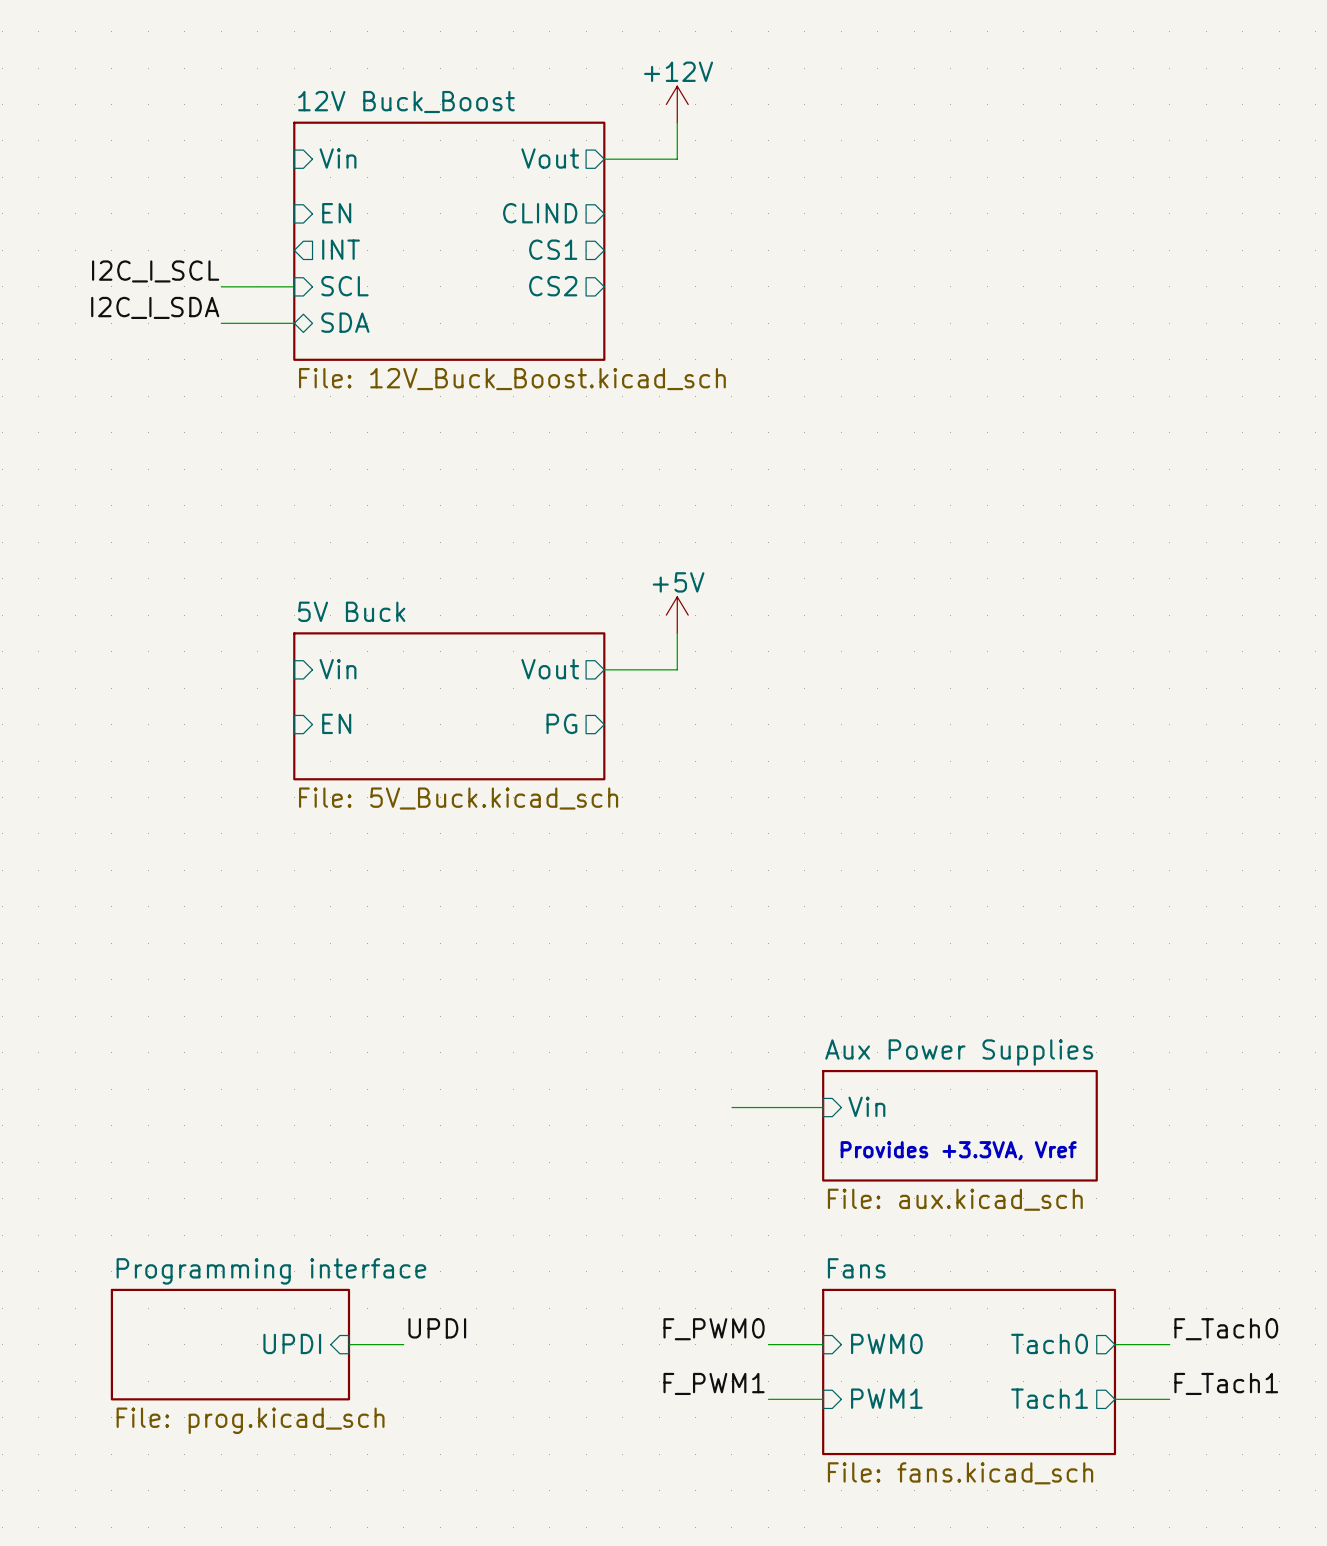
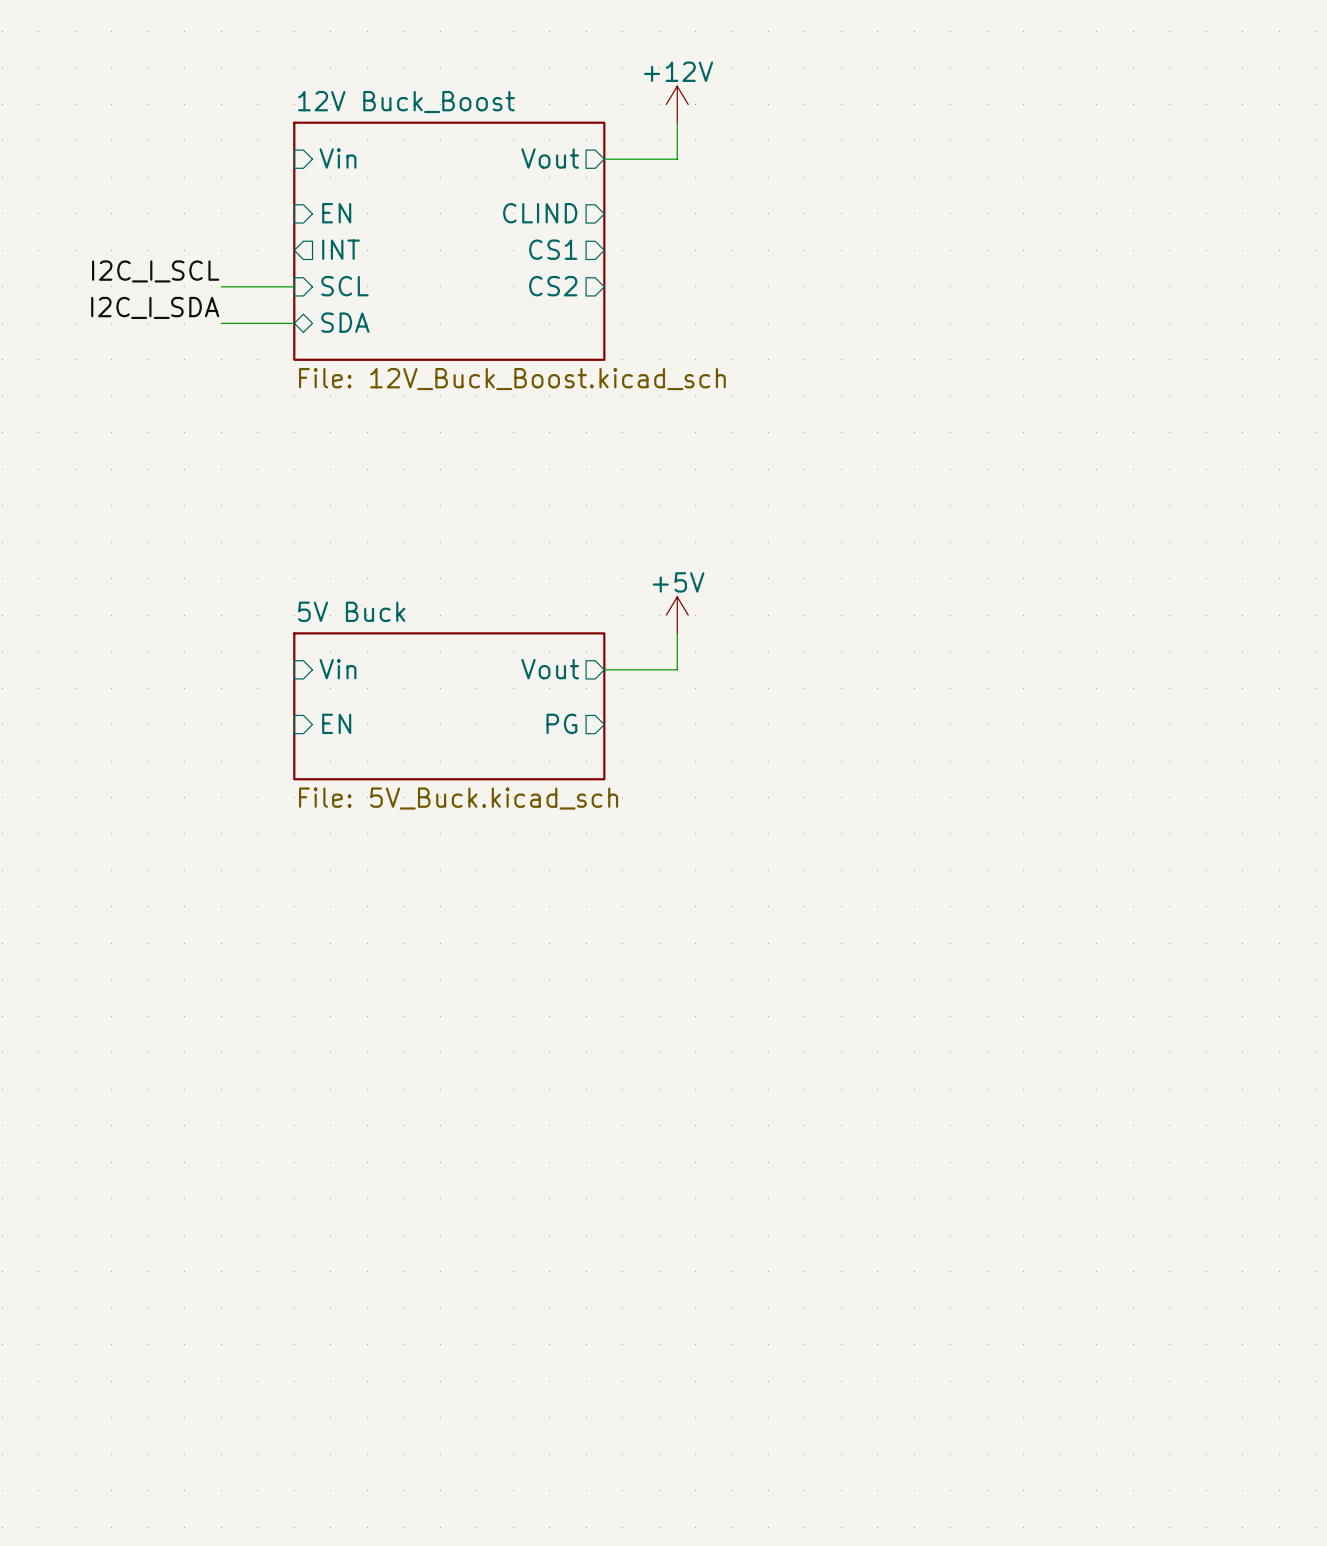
sheet pin: Vin (866, 1106) -> none
wire: (731, 1107) (823, 1107) -> none
sheet Aux Power Supplies: File: aux.kicad_sch (959, 1125) -> none
text: Provides +3.3VA, Vref (958, 1150) -> none
label: UPDI (437, 1328) -> none
label: F_PWM0 (714, 1329) -> none
label: F_Tach0 (1226, 1329) -> none
sheet pin: UPDI (292, 1343) -> none
sheet pin: PWM0 (886, 1343) -> none
sheet pin: Tach0 (1049, 1343) -> none
sheet Programming interface: File: prog.kicad_sch (230, 1344) -> none
wire: (349, 1344) (403, 1344) -> none
wire: (768, 1344) (823, 1344) -> none
wire: (1114, 1344) (1169, 1344) -> none
sheet Fans: File: fans.kicad_sch (969, 1371) -> none
label: F_PWM1 (714, 1383) -> none
label: F_Tach1 (1226, 1383) -> none
sheet pin: PWM1 (886, 1398) -> none
sheet pin: Tach1 (1049, 1398) -> none
wire: (768, 1399) (823, 1399) -> none
wire: (1114, 1399) (1169, 1399) -> none

